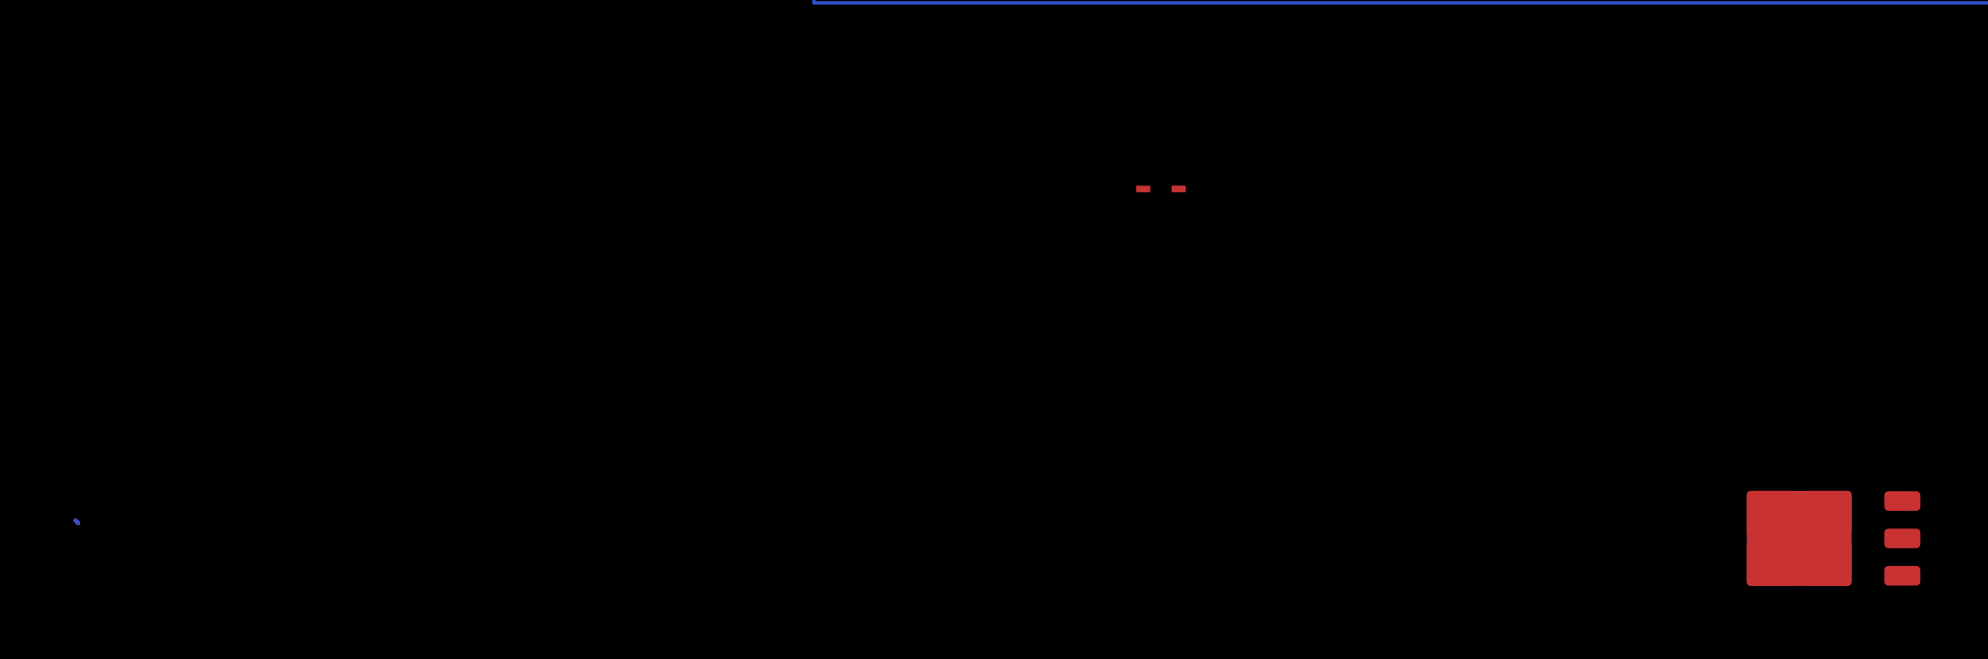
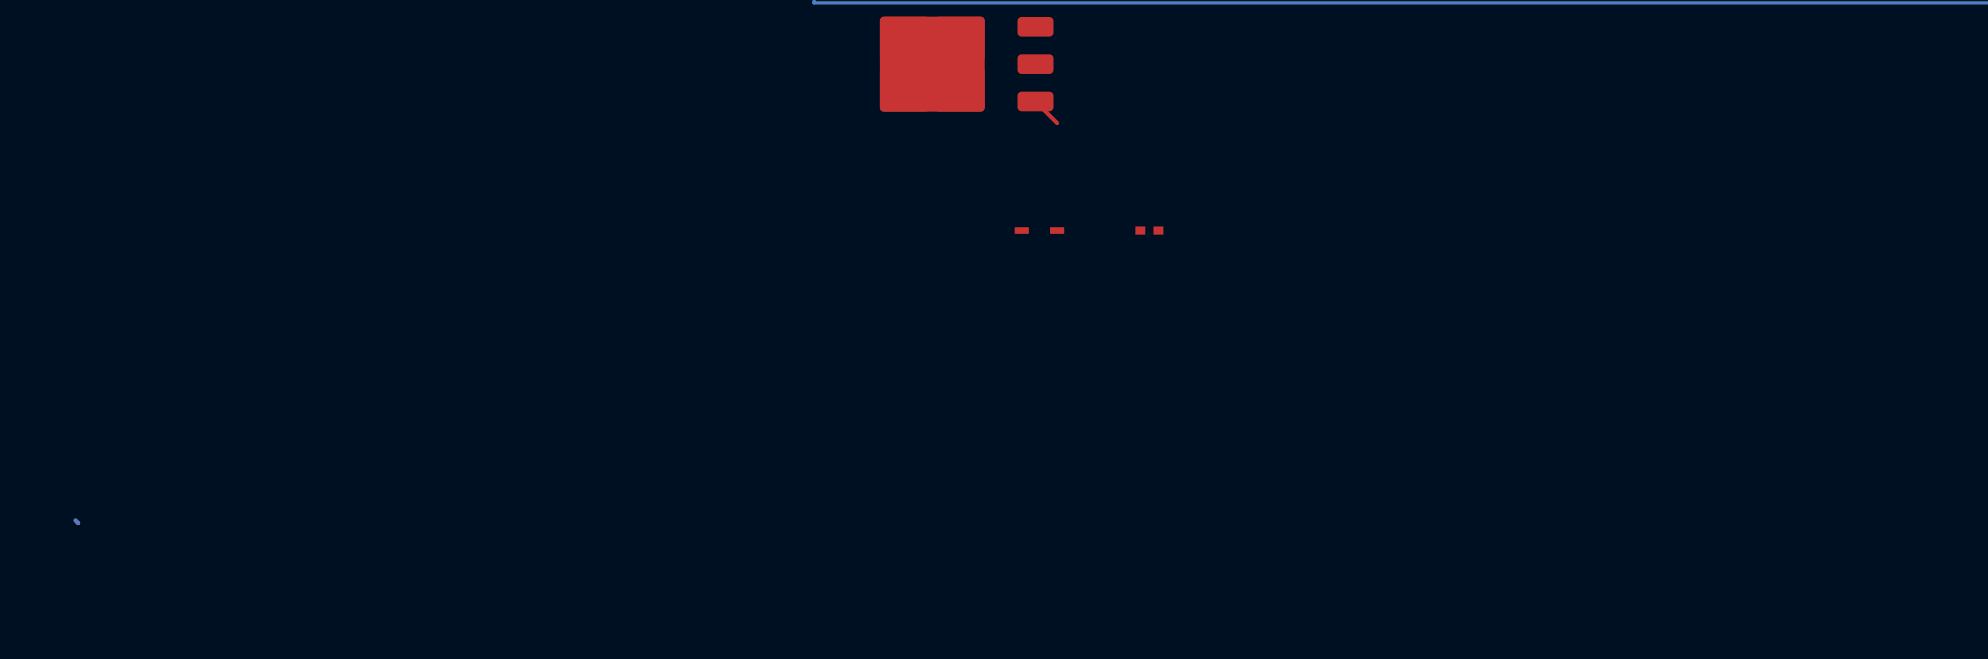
part: none -> (966, 64)
top track: none -> (1035, 101) (1057, 123)
part position: (1160, 188) -> (1039, 230)
part: none -> (1149, 230)
part: (1833, 538) -> none

